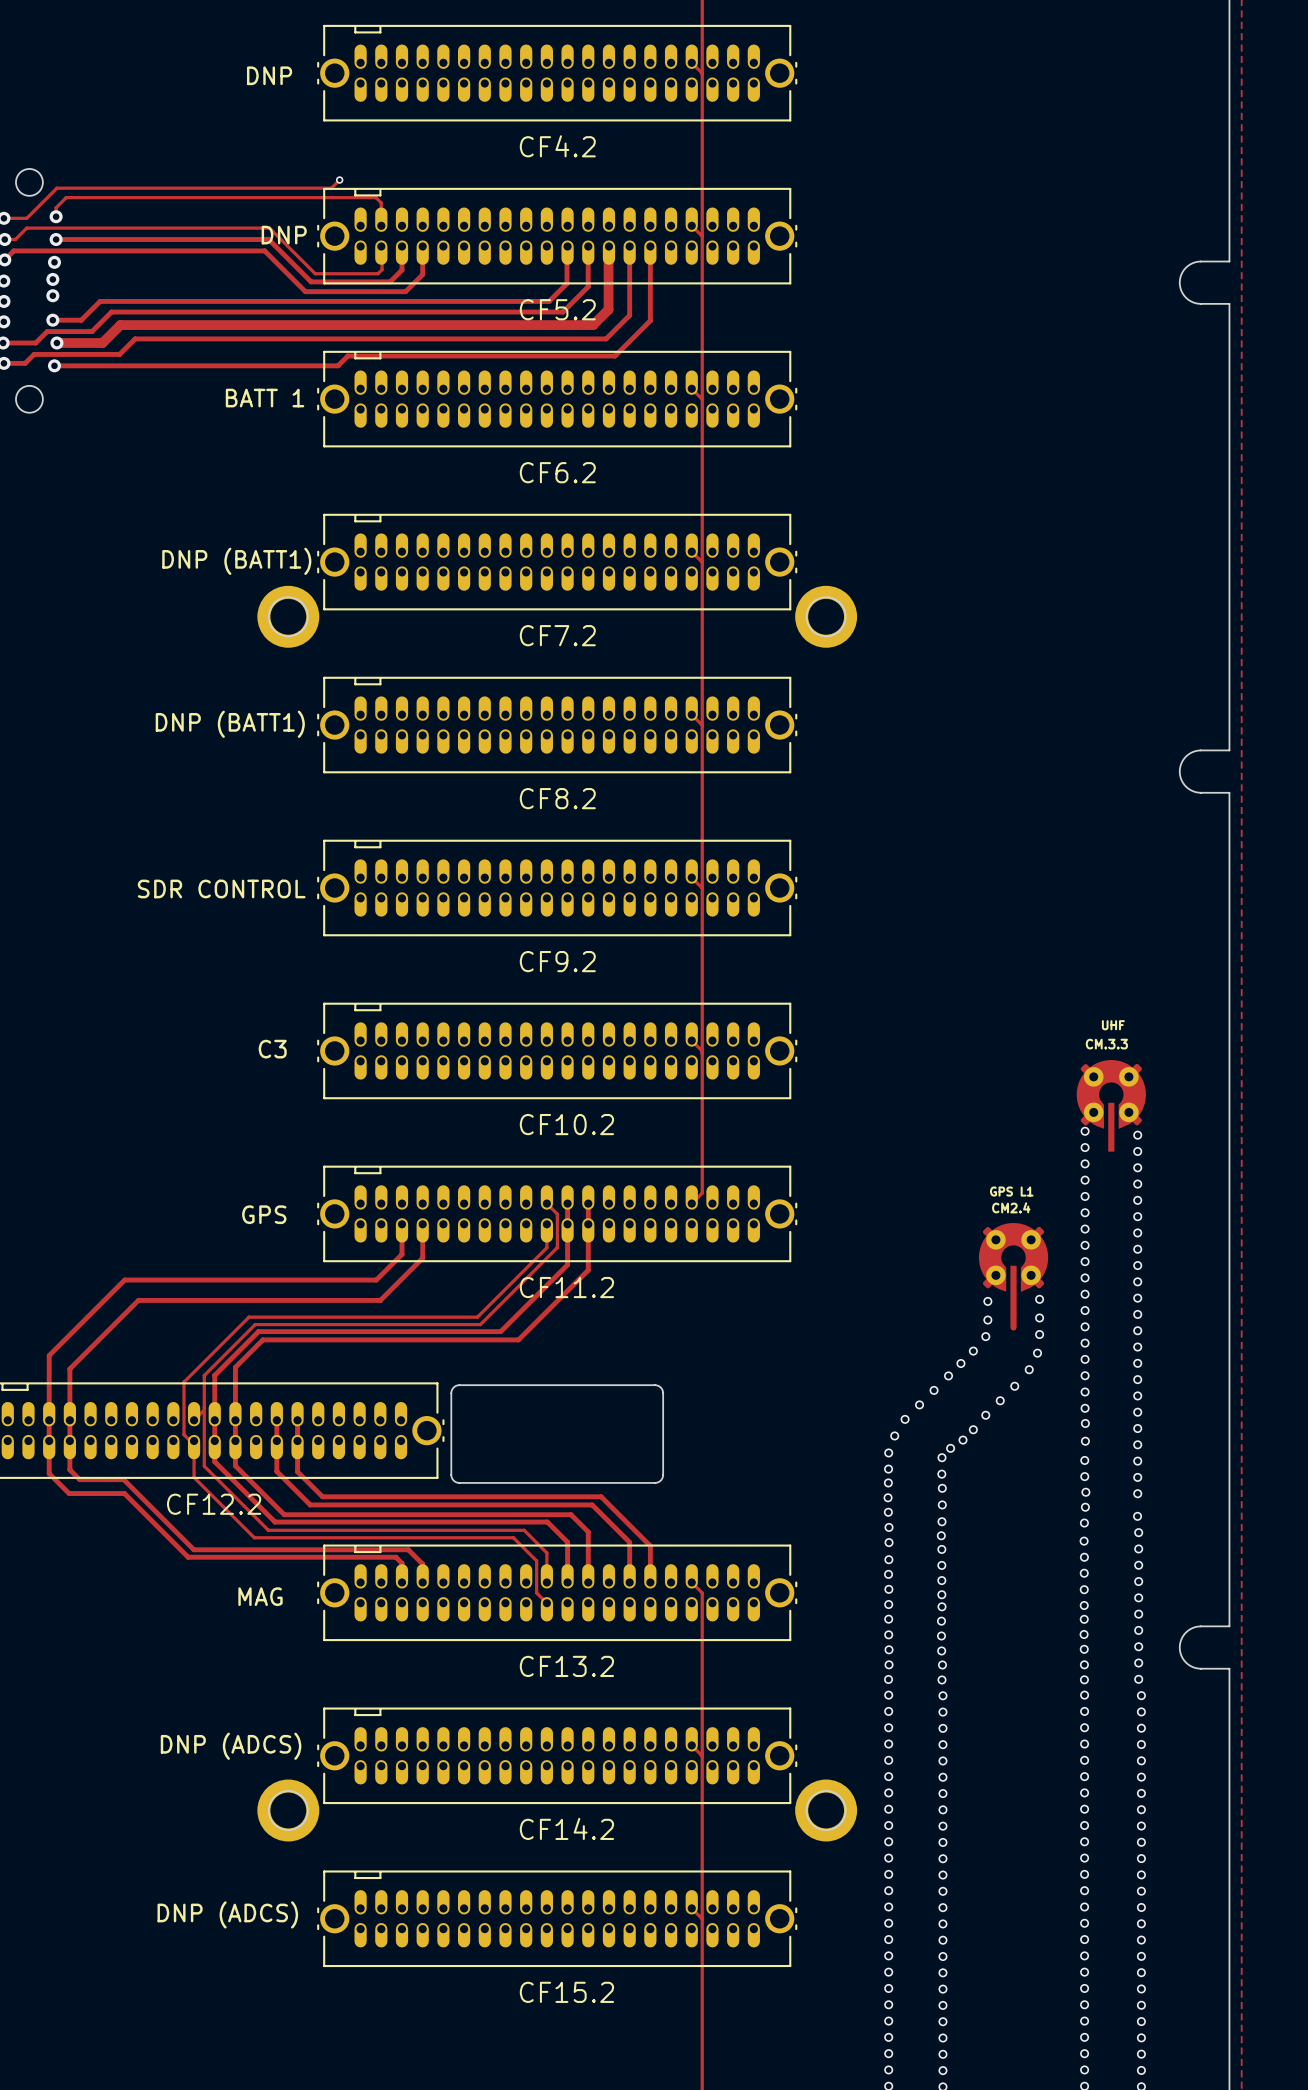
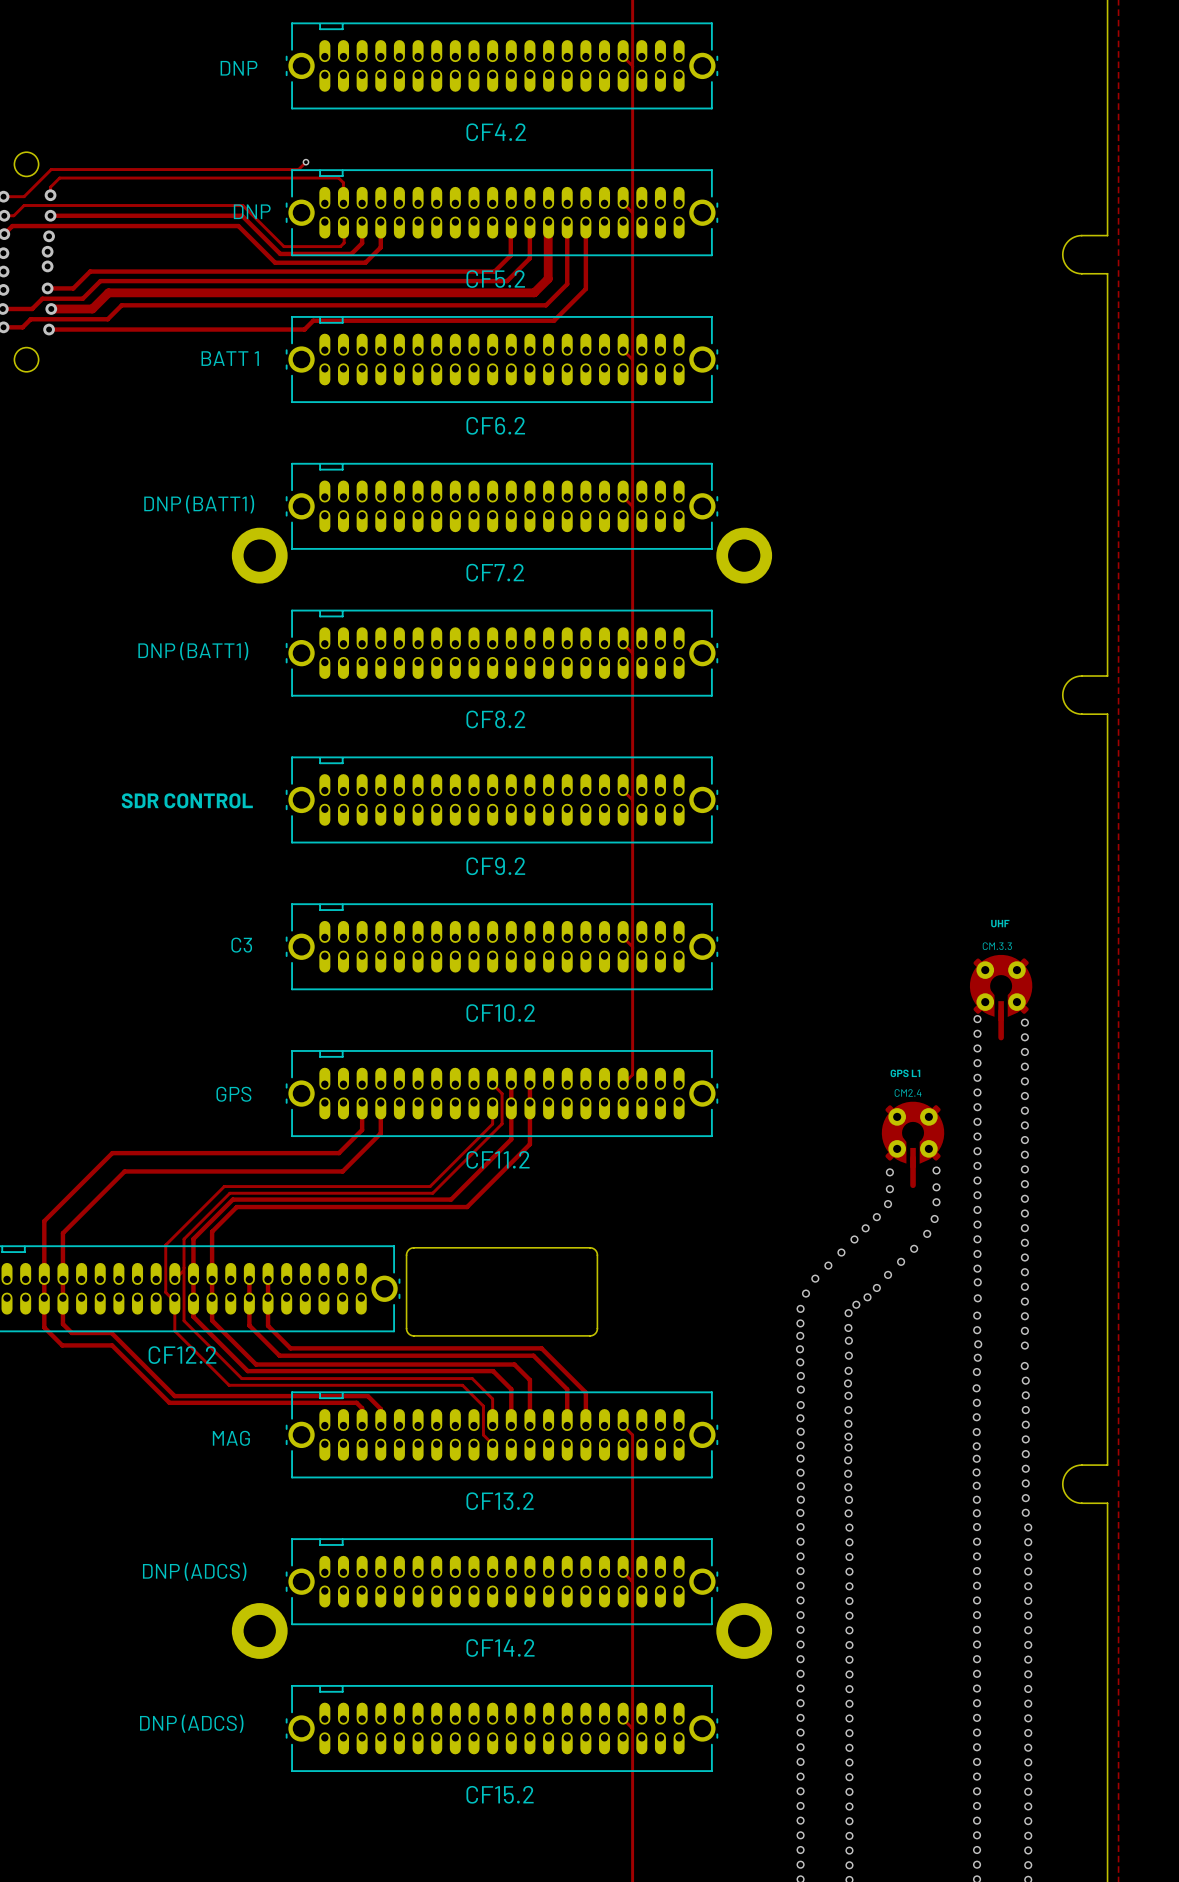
CM.3.3 footprint: [1076, 1060, 1146, 1152] -> [969, 954, 1033, 1021]
track: none -> (1001, 1011) (1001, 1037)
CM2.4 footprint: [978, 1223, 1049, 1315] -> [881, 1101, 945, 1168]
track: none -> (913, 1157) (913, 1184)
track: (1013, 1315) (1013, 1327) -> none

